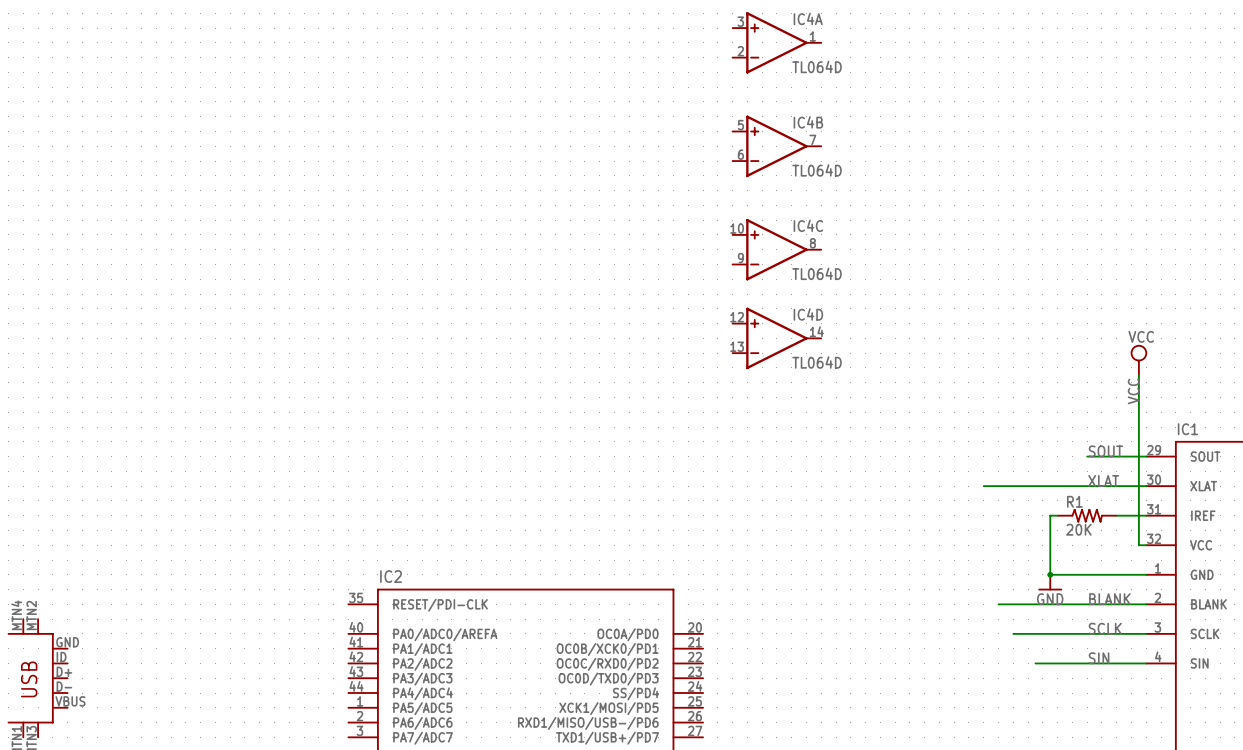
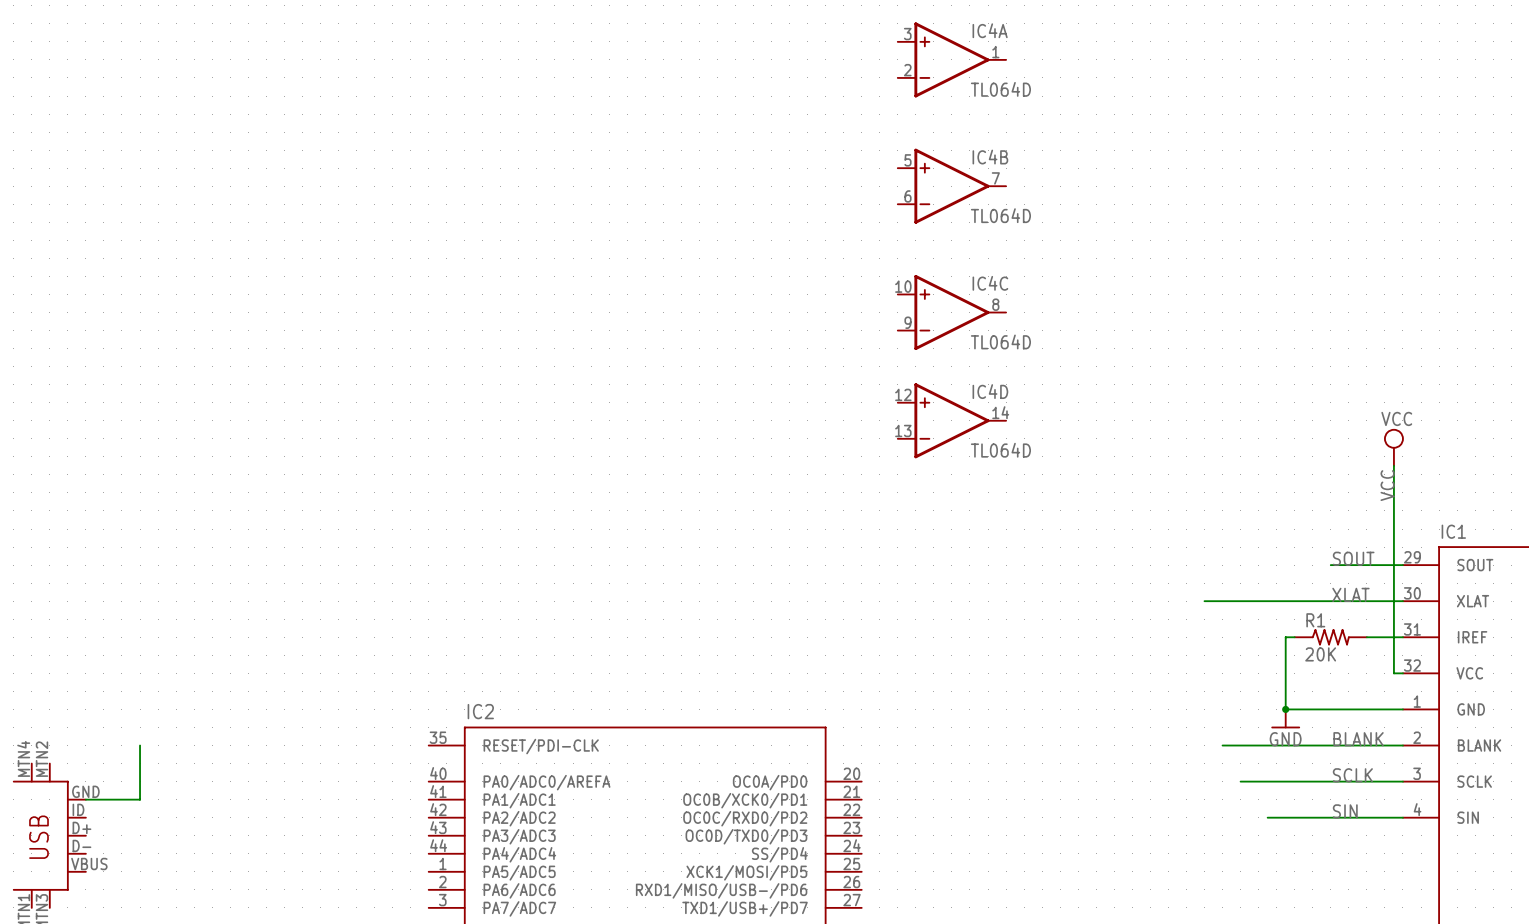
wire: none -> (140, 745) (140, 799) (85, 799)

